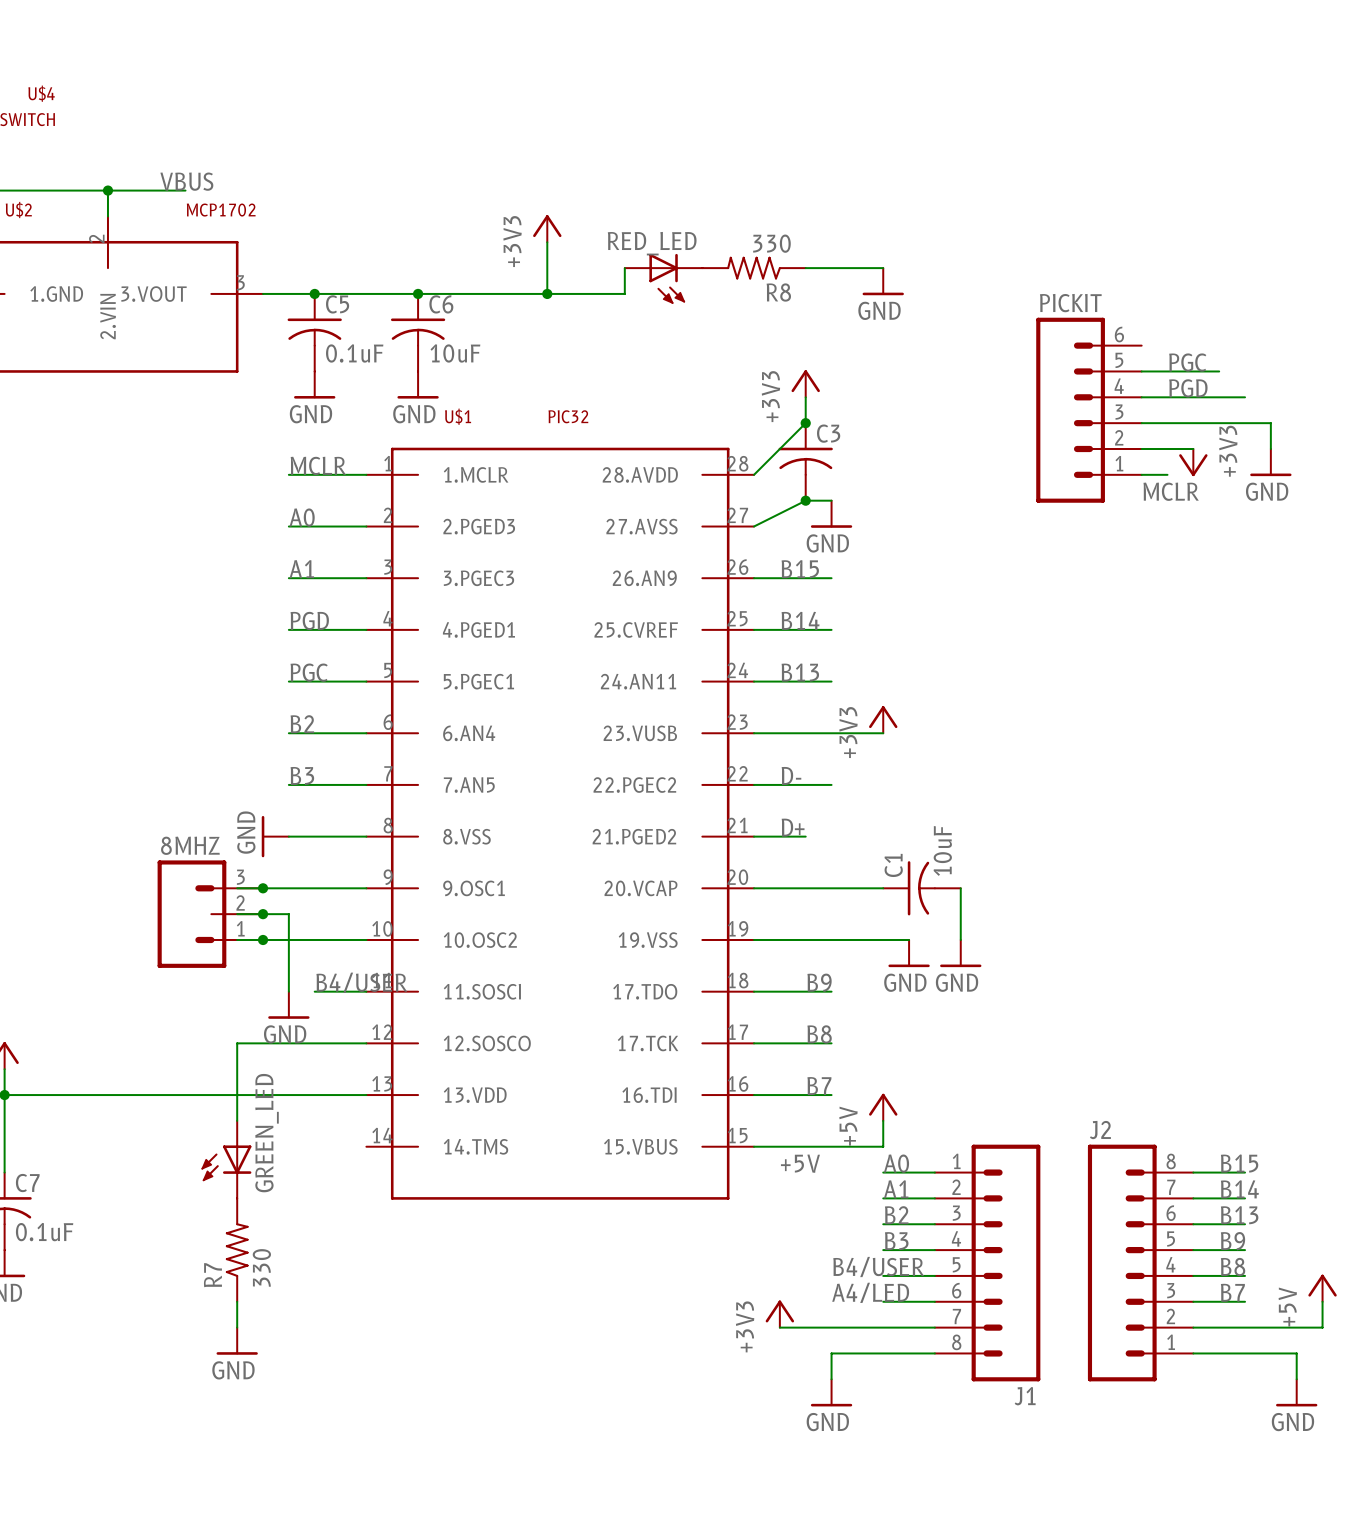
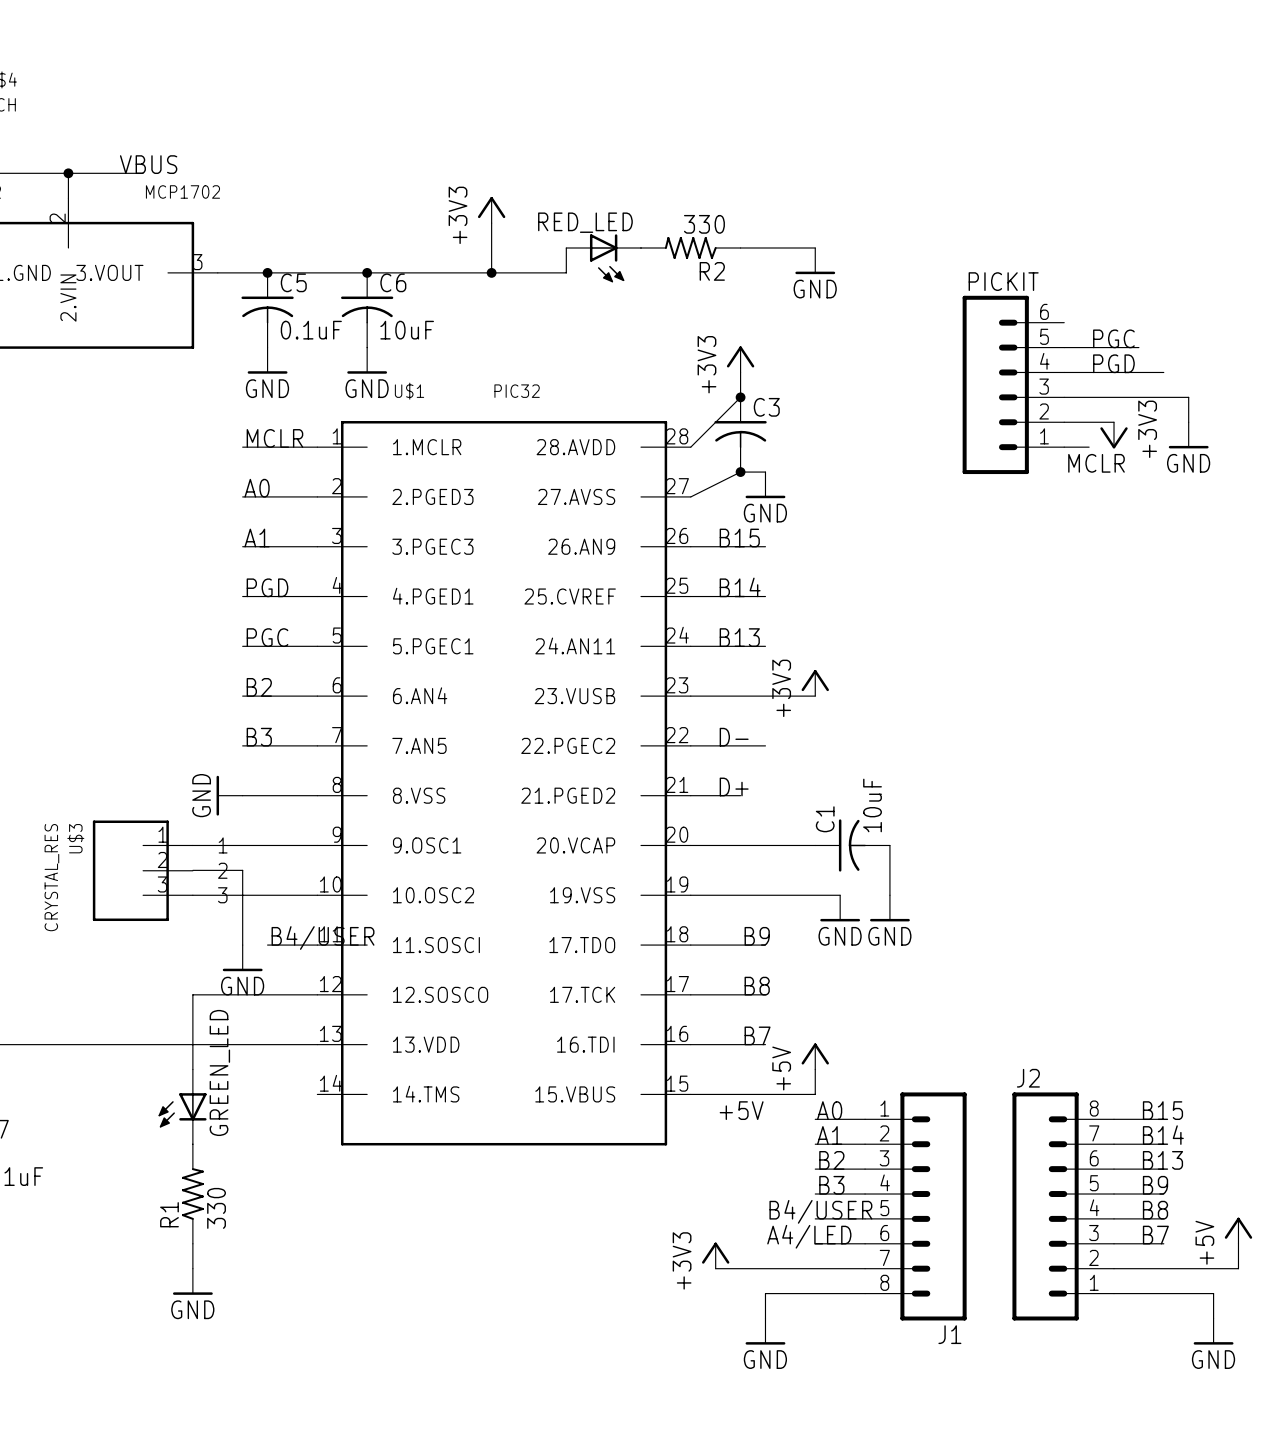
R8 name: R8 (778, 292) -> R2 (712, 271)
junction: (263, 888) -> none
U$3: none -> CRYSTAL_RES (142, 870)
8MHZ: (210, 914) -> none
junction: (263, 914) -> none
junction: (263, 939) -> none
R7 name: R7 (212, 1275) -> R1 (169, 1214)

